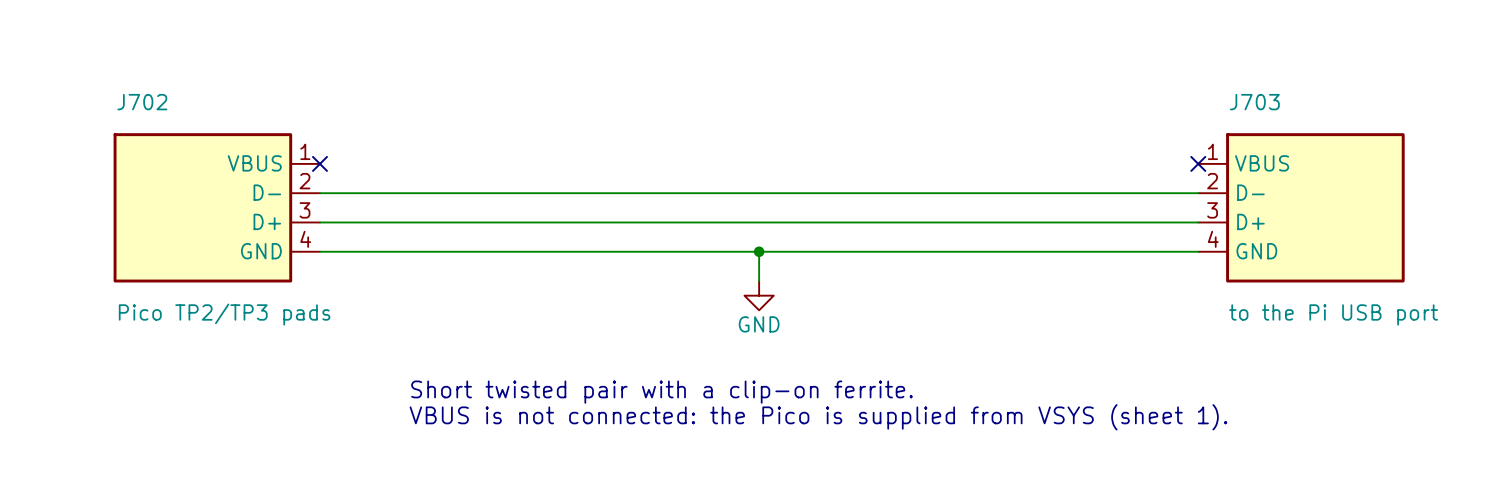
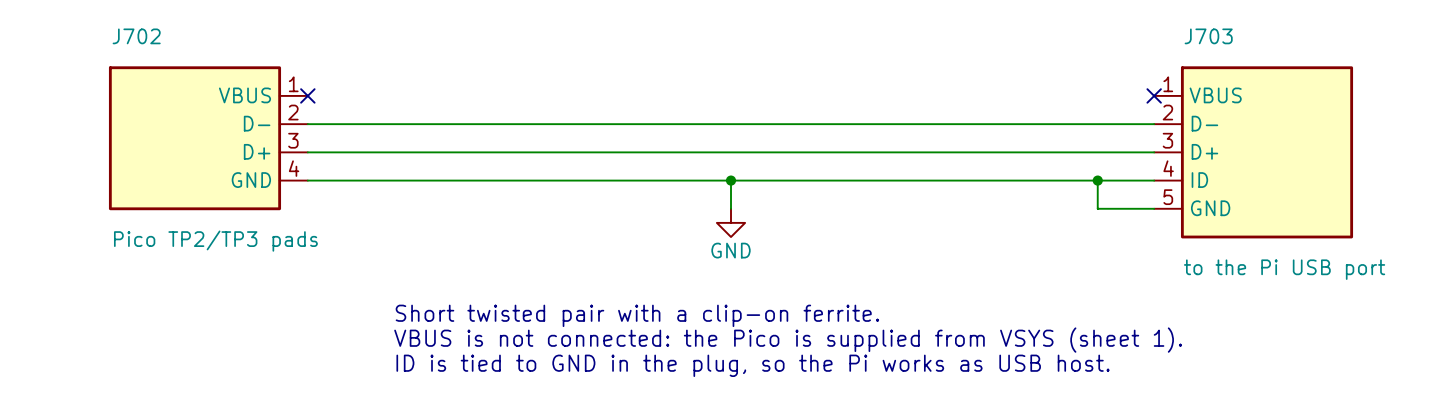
J703 symbol: [1198, 133, 1405, 283] -> [1154, 66, 1354, 239]
wire: none -> (1097, 180) (1097, 208) (1154, 208)
junction: none -> (1097, 180)
text: none -> ID is tied to GND in the plug, so the Pi works as USB host. (753, 365)

